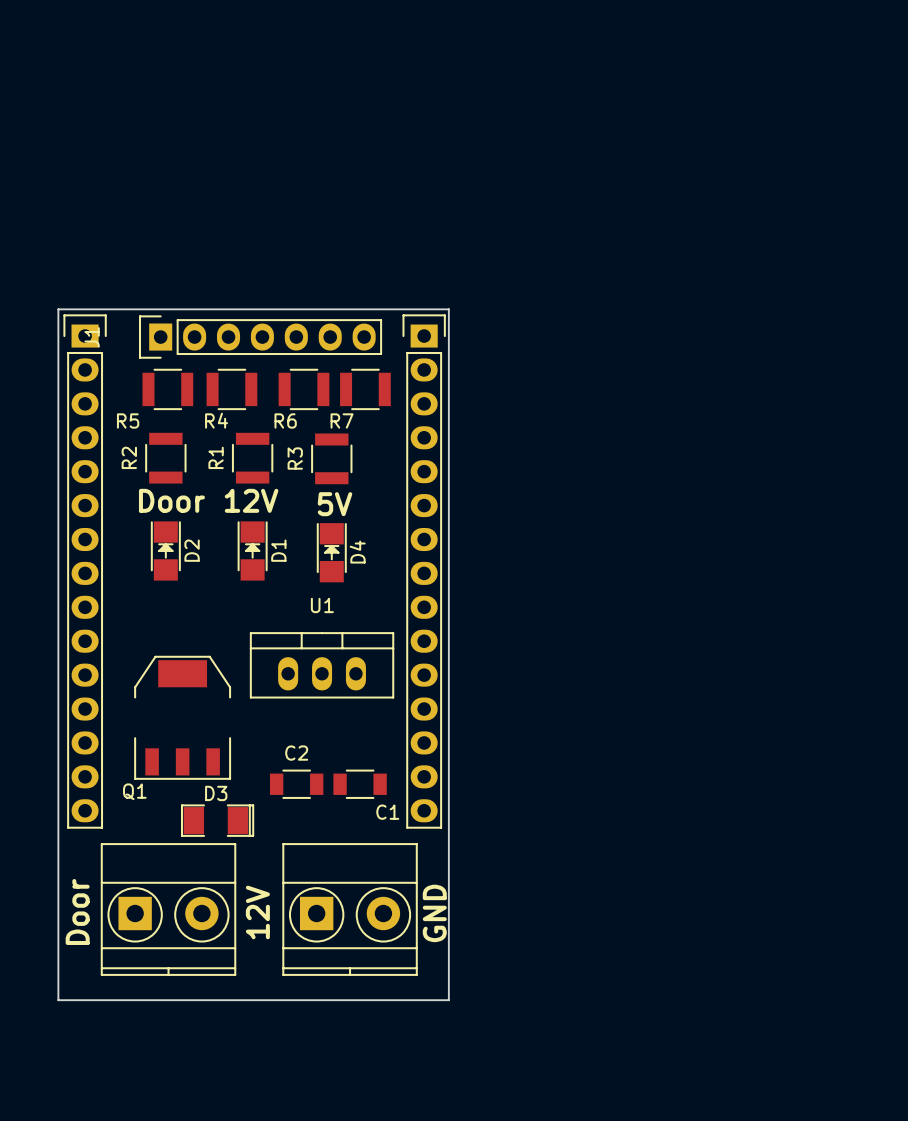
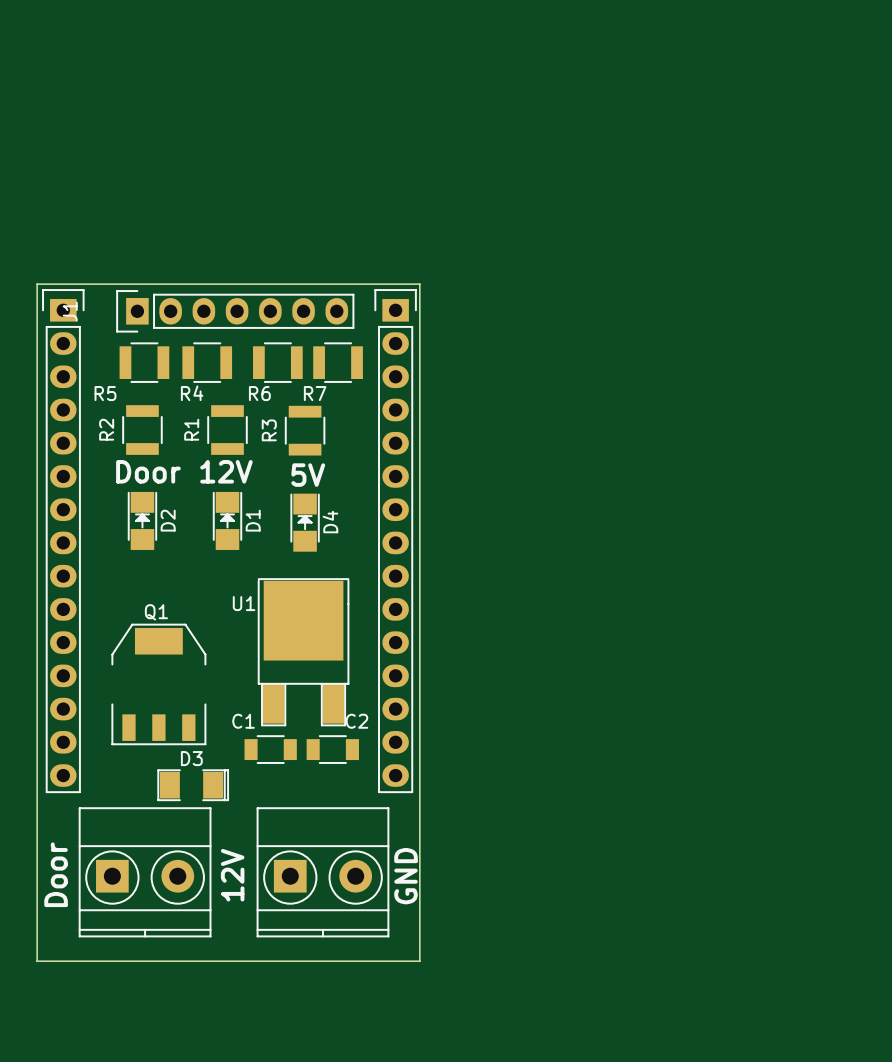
U1 name position: U1 (322, 605) -> U1 (244, 603)
U1 footprint: [249, 632, 395, 699] -> [257, 578, 350, 727]
C2 name: C2 (296, 753) -> C1 (243, 721)
Q1 name position: Q1 (134, 791) -> Q1 (156, 612)
C1 name: C1 (387, 812) -> C2 (356, 721)

